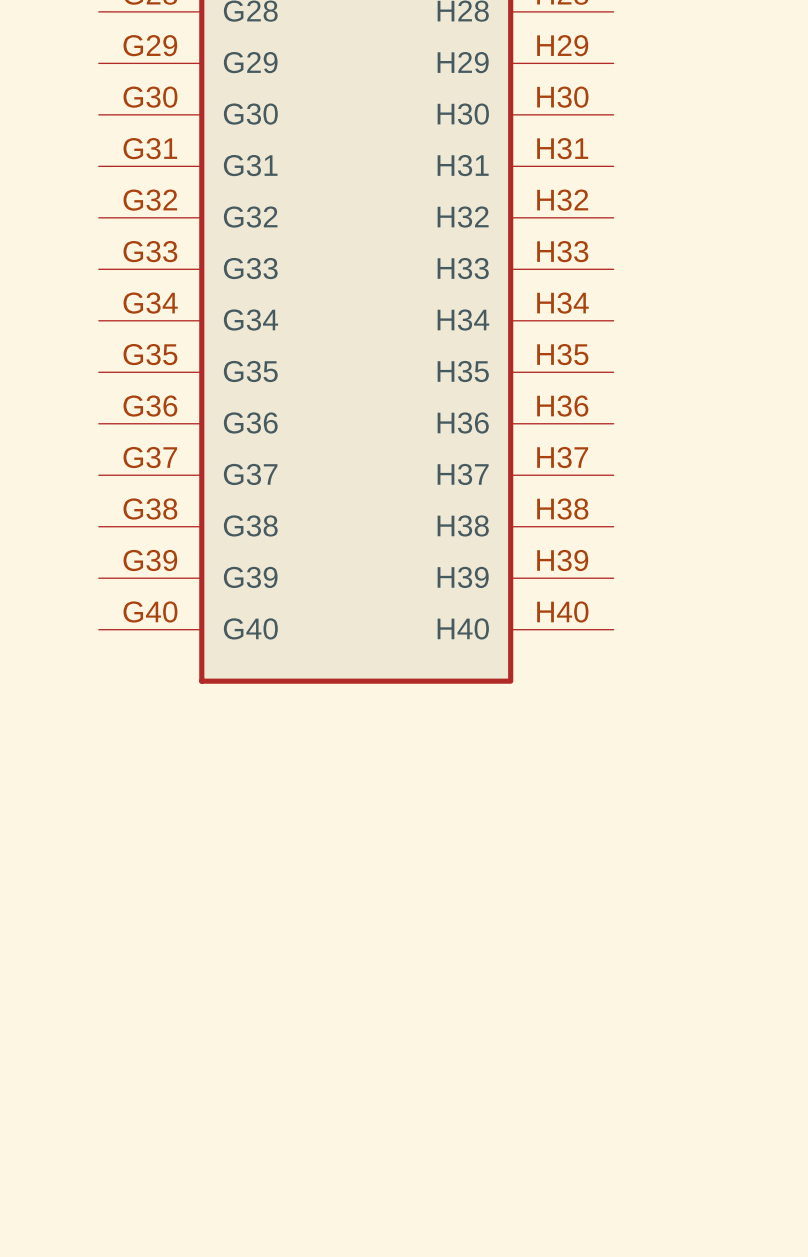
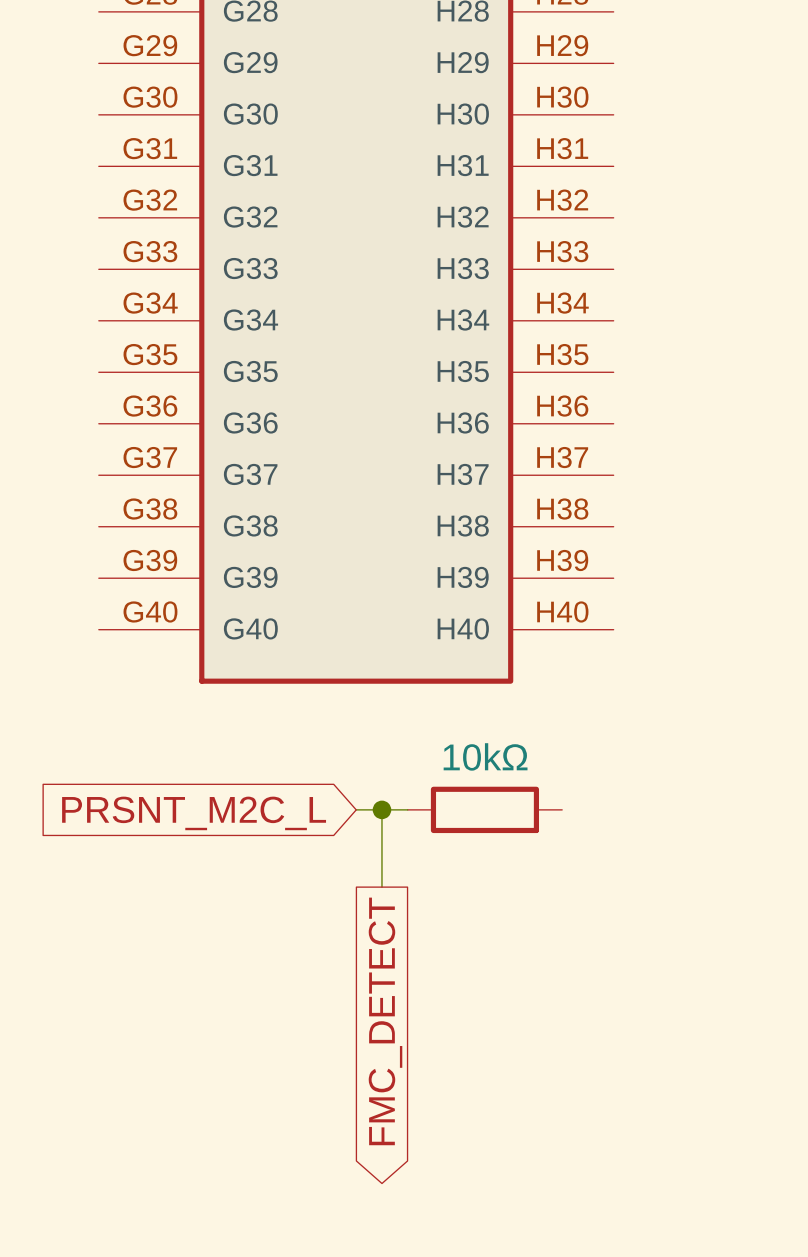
wire: none -> (356, 809) (407, 809)
wire: none -> (381, 809) (381, 887)
junction: none -> (381, 809)
part: none -> 10kΩ (484, 809)
global label: none -> PRSNT_M2C_L (194, 813)
global label: none -> FMC_DETECT (385, 1021)

